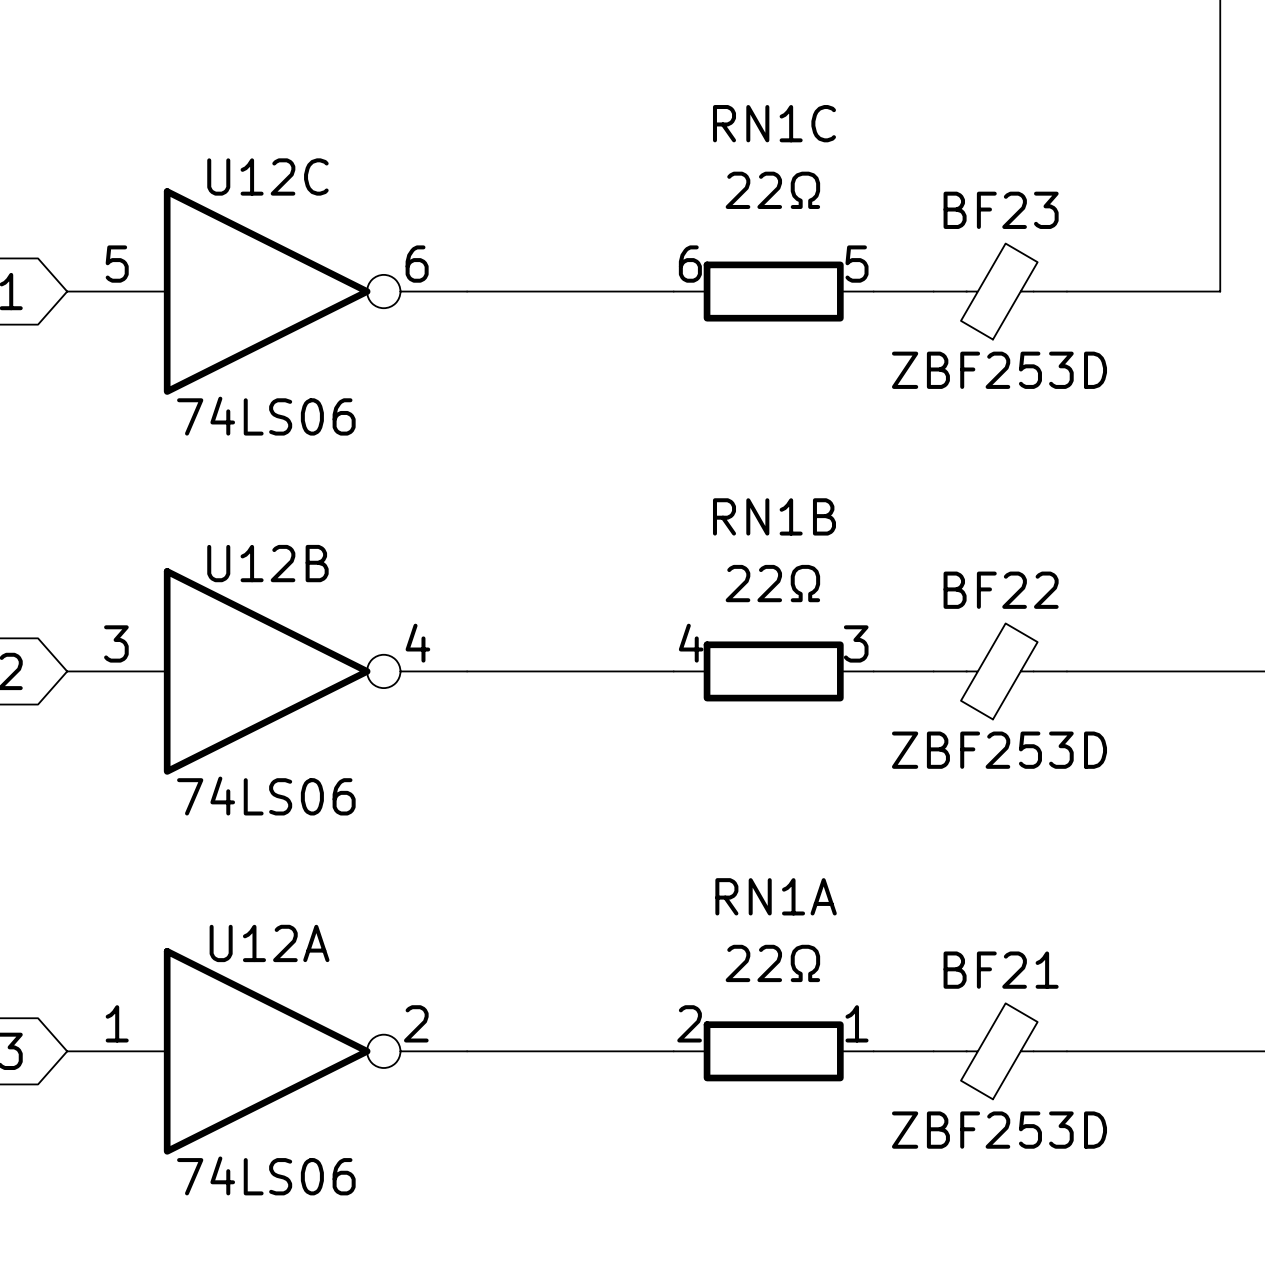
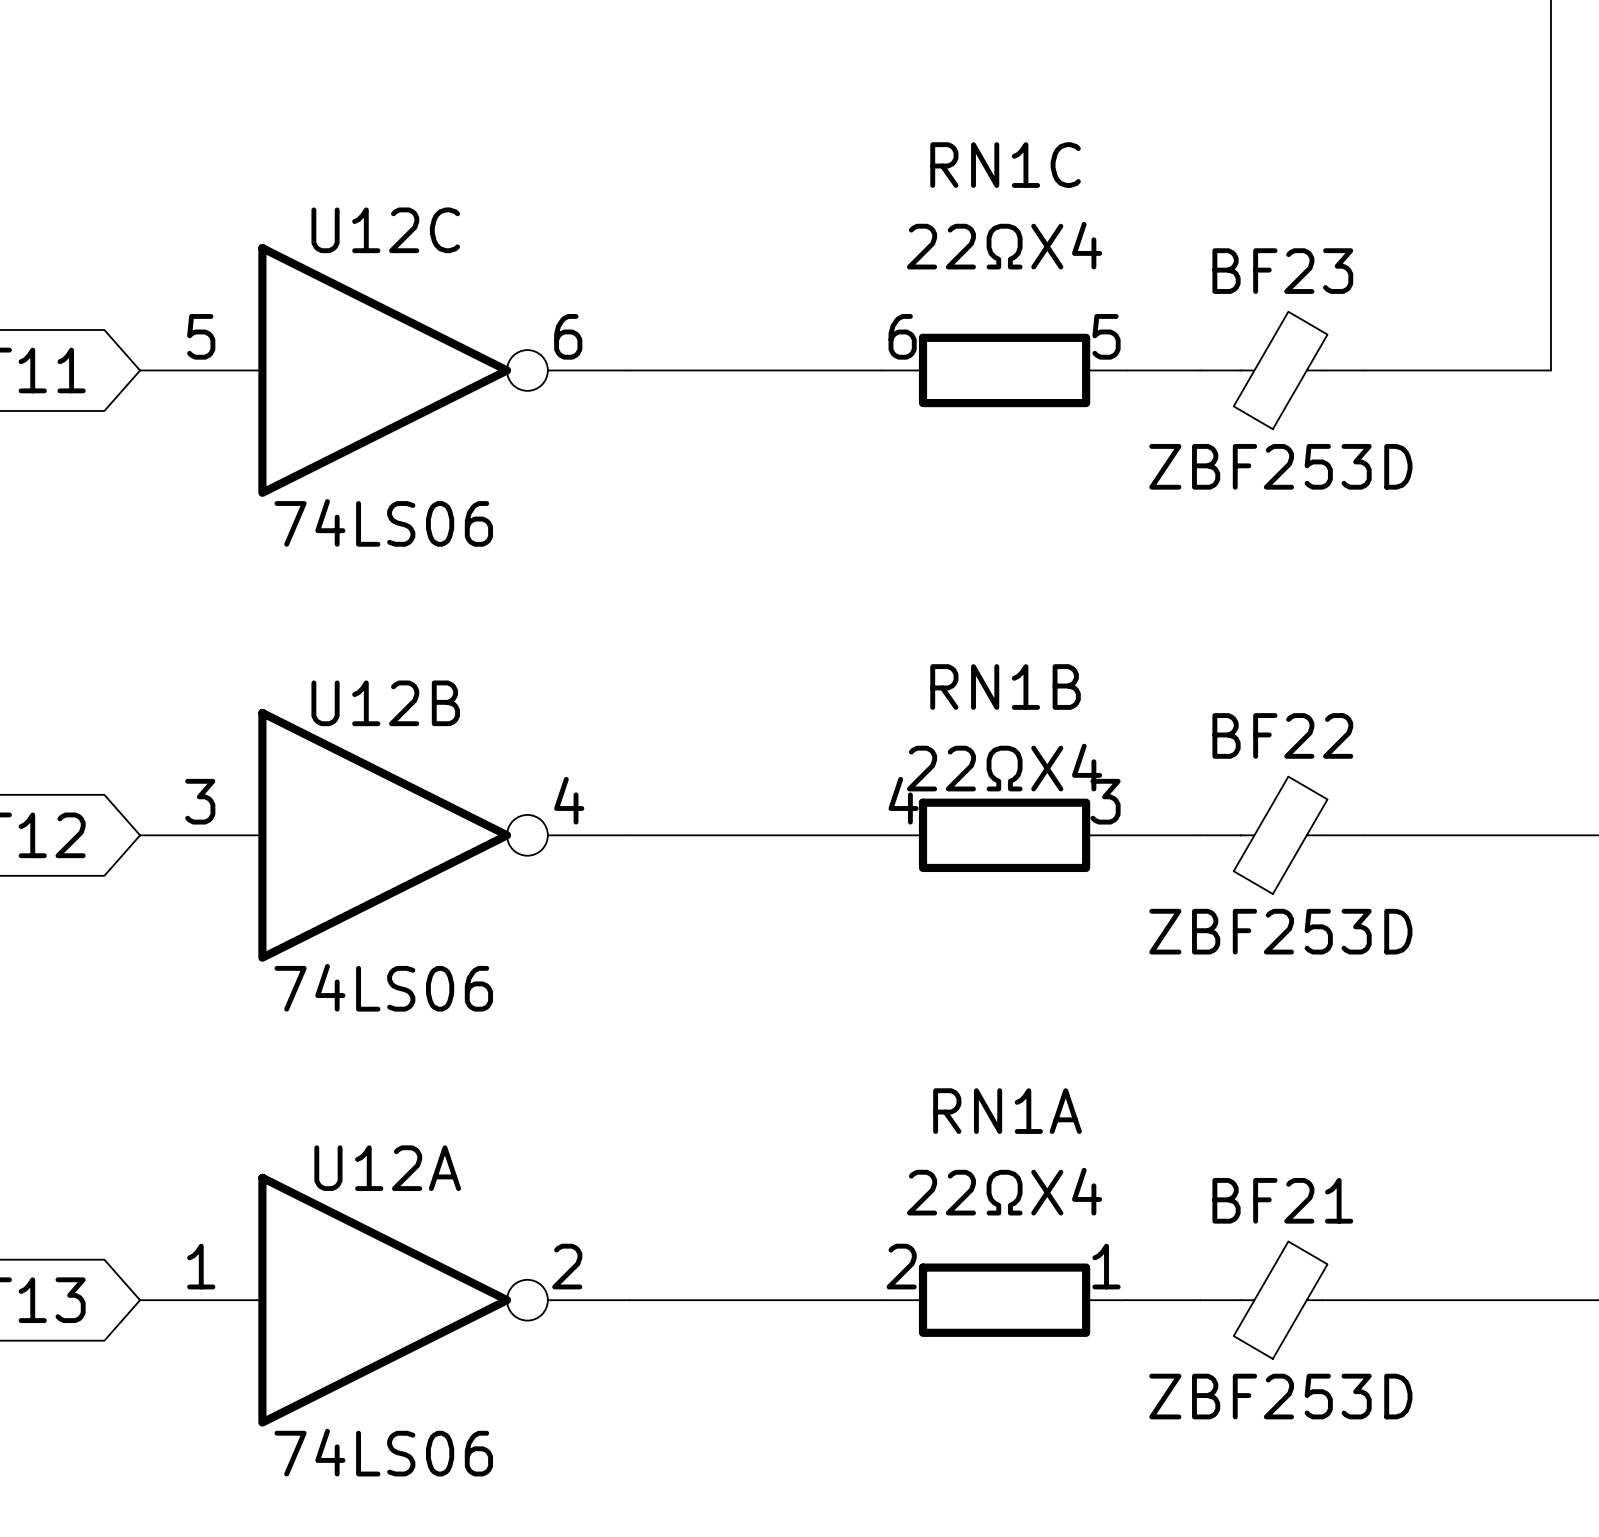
RN1C value: 22Ω (772, 190) -> 22ΩX4 (1004, 245)
RN1B name position: RN1B (774, 516) -> RN1B (1005, 687)
RN1B value: 22Ω (772, 583) -> 22ΩX4 (1004, 767)
RN1A value: 22Ω (772, 963) -> 22ΩX4 (1004, 1191)

